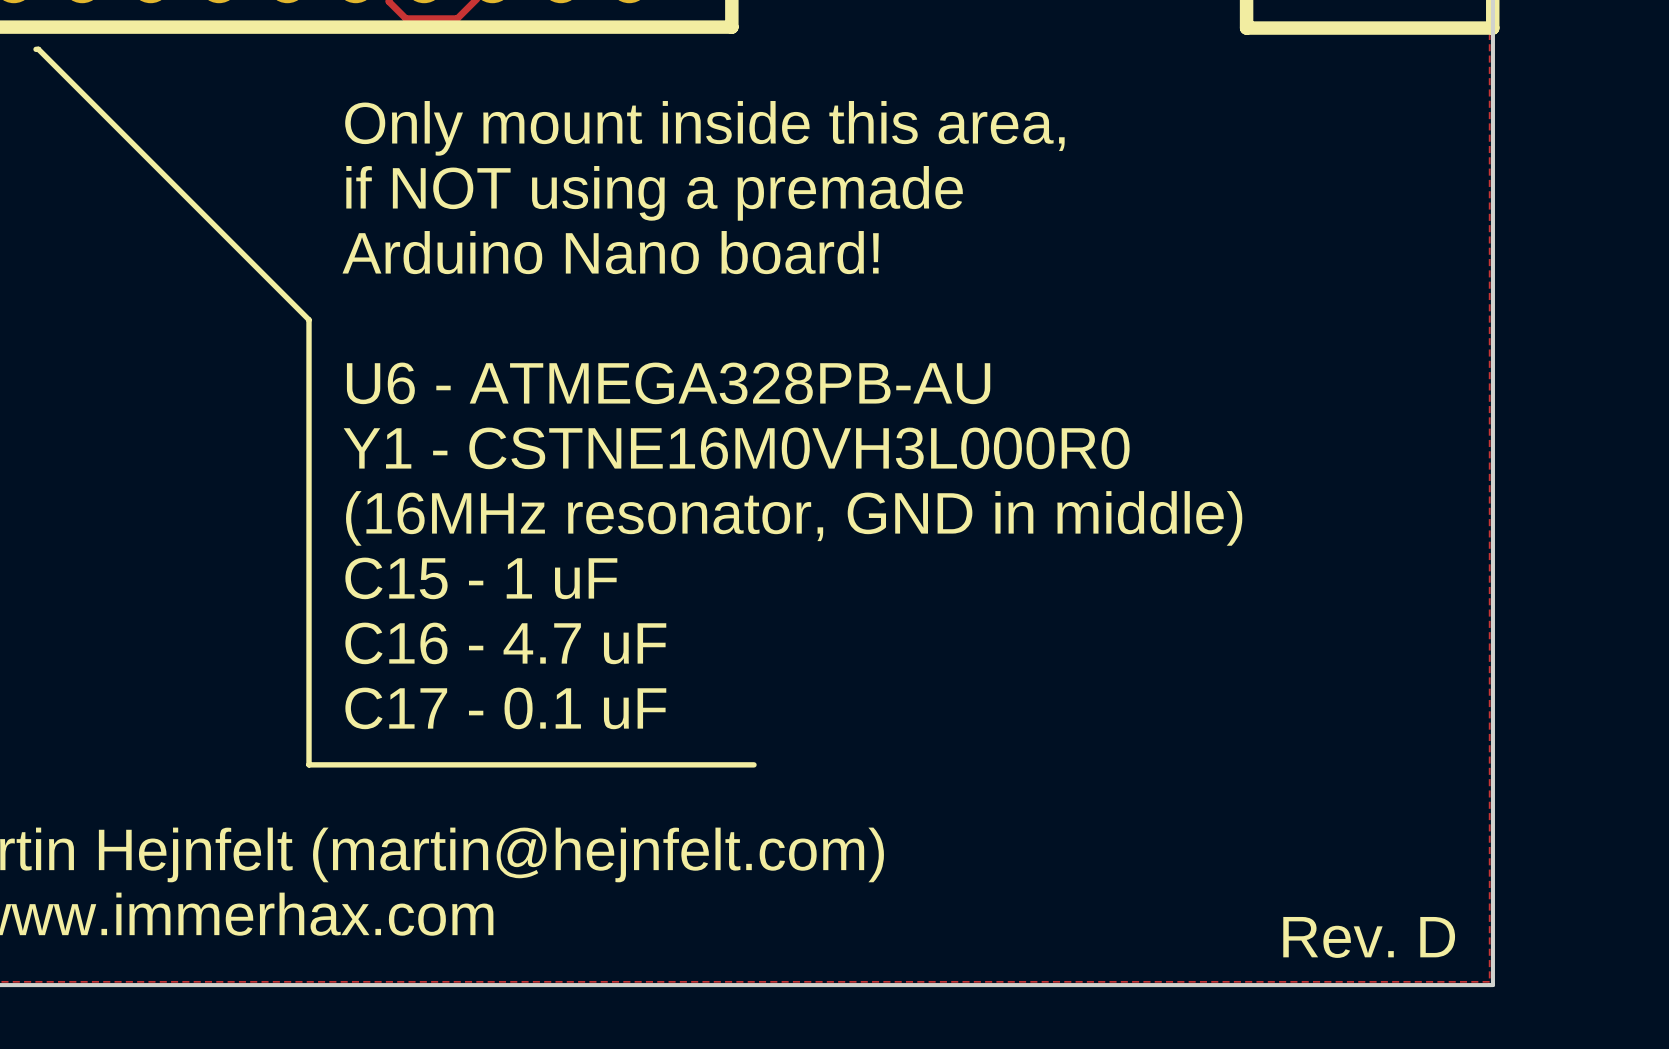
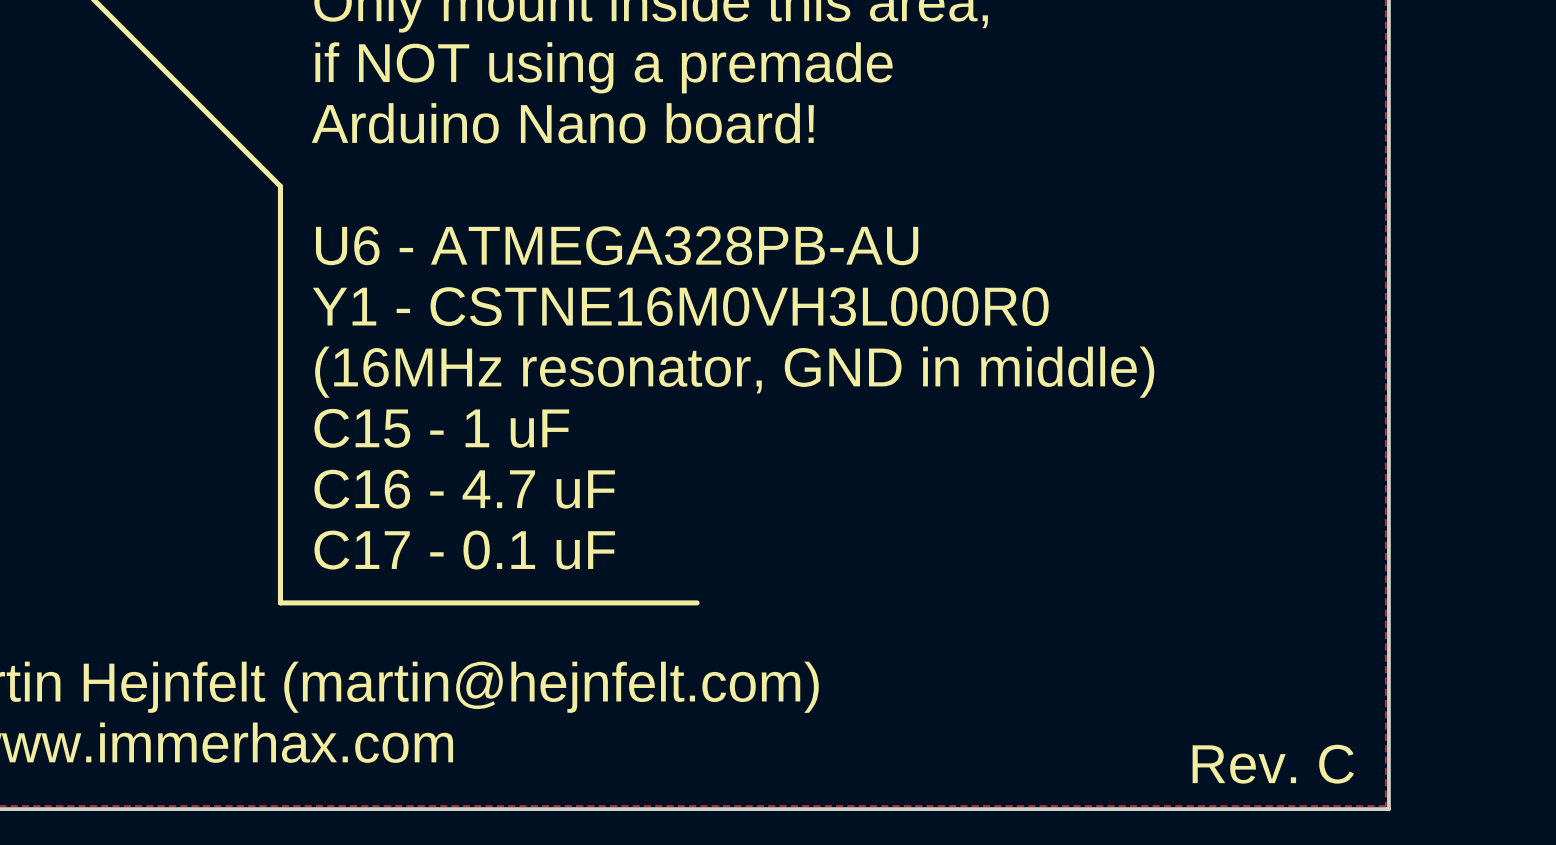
text: Rev. D (1369, 937) -> Rev. C (1273, 764)

